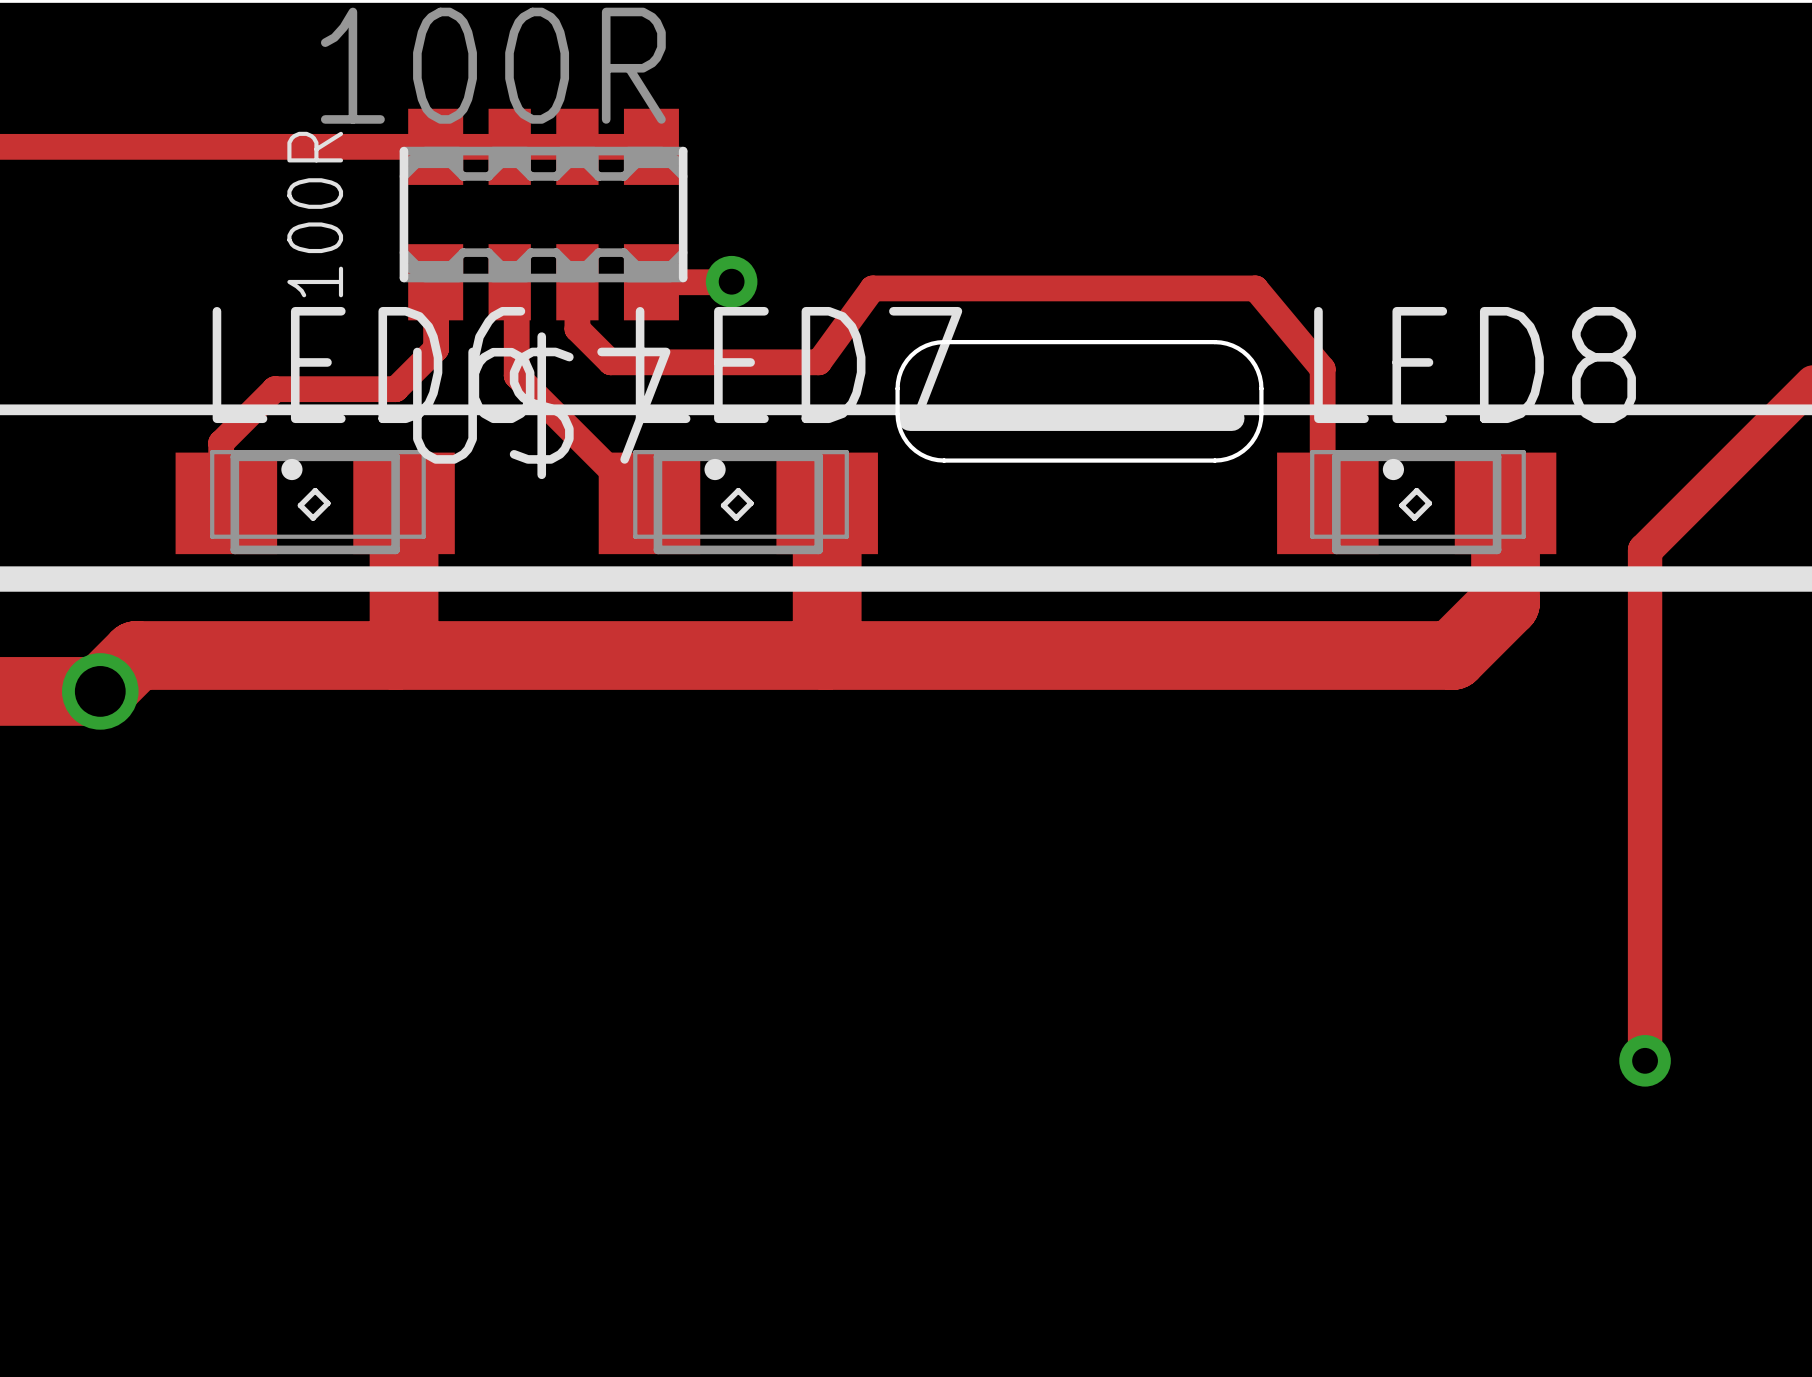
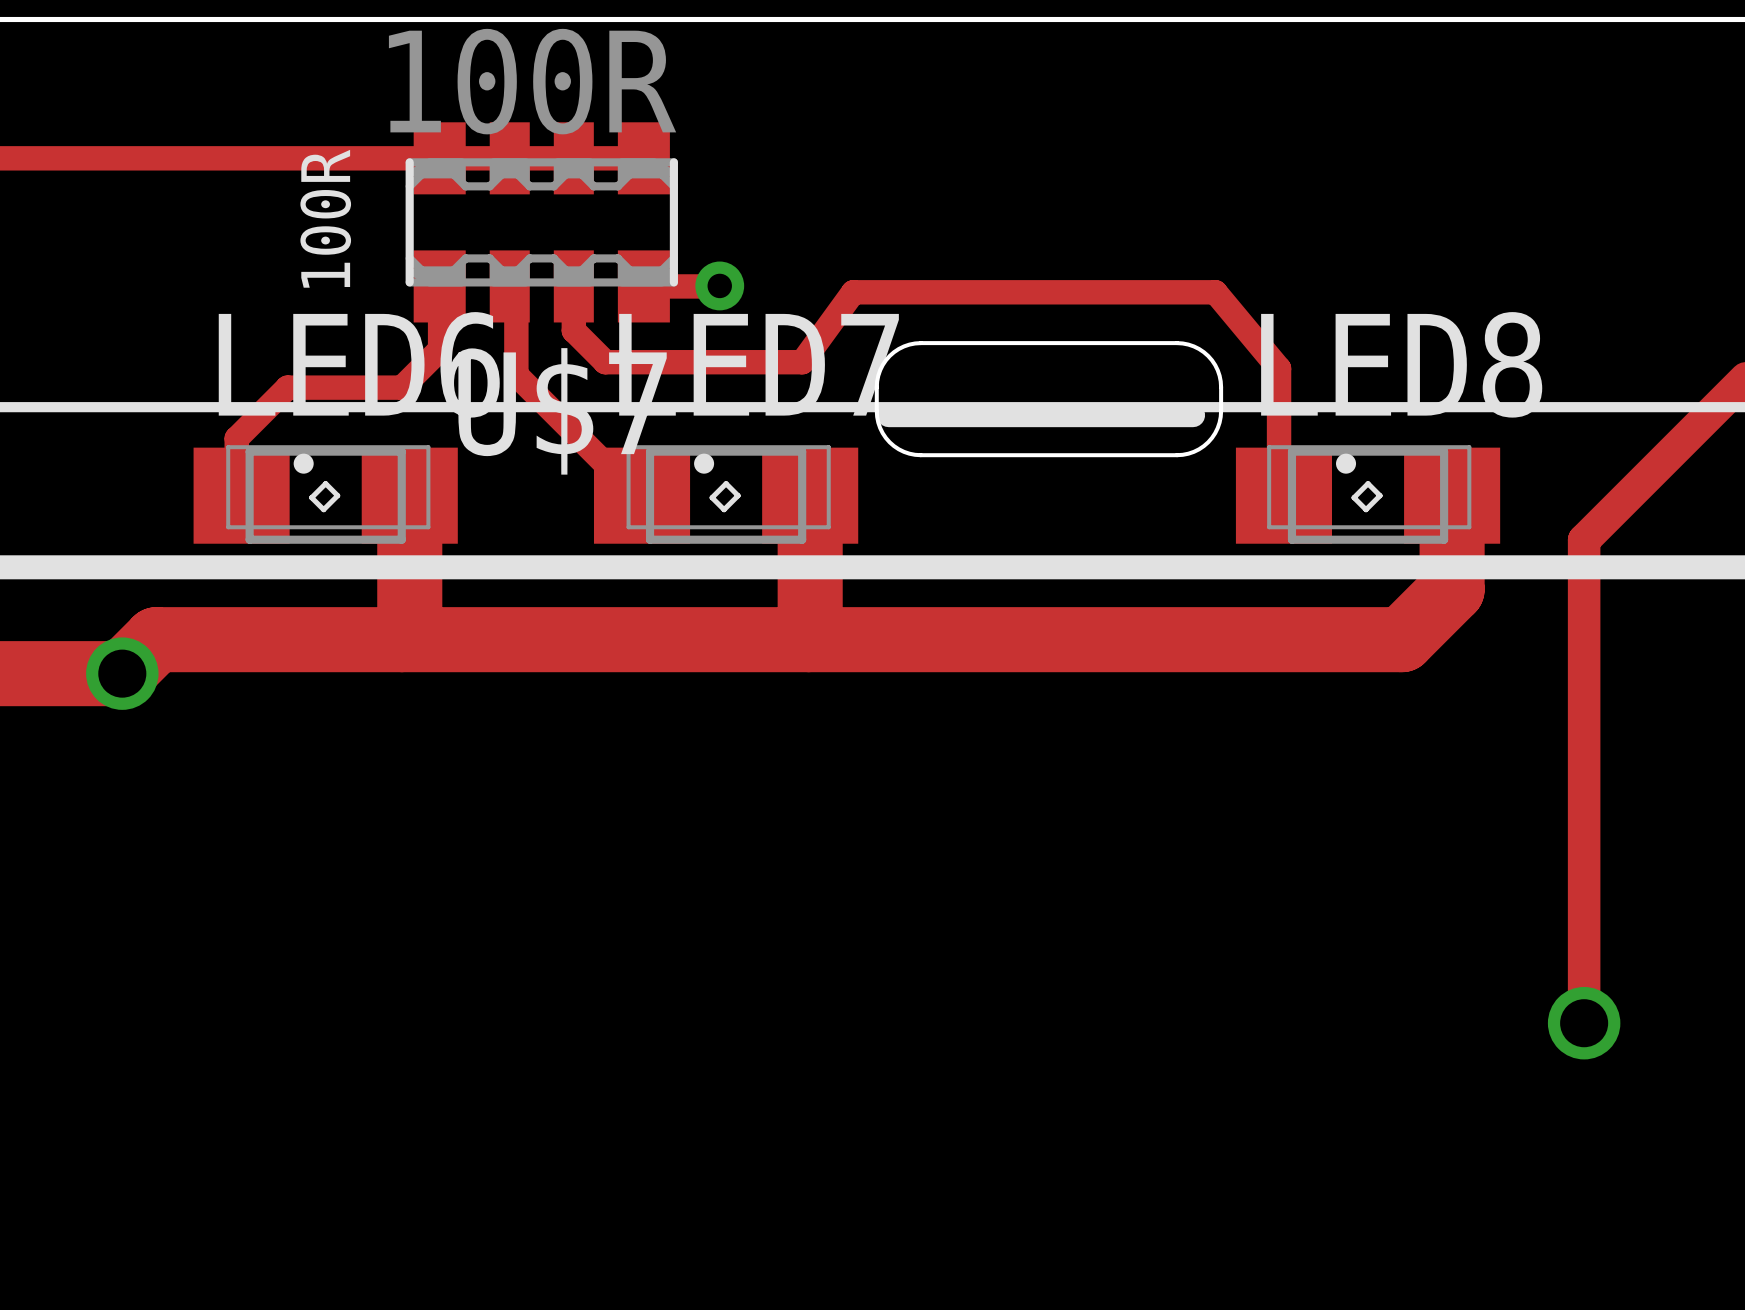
via size: [1619, 1035, 1671, 1087] -> [1547, 986, 1621, 1060]

